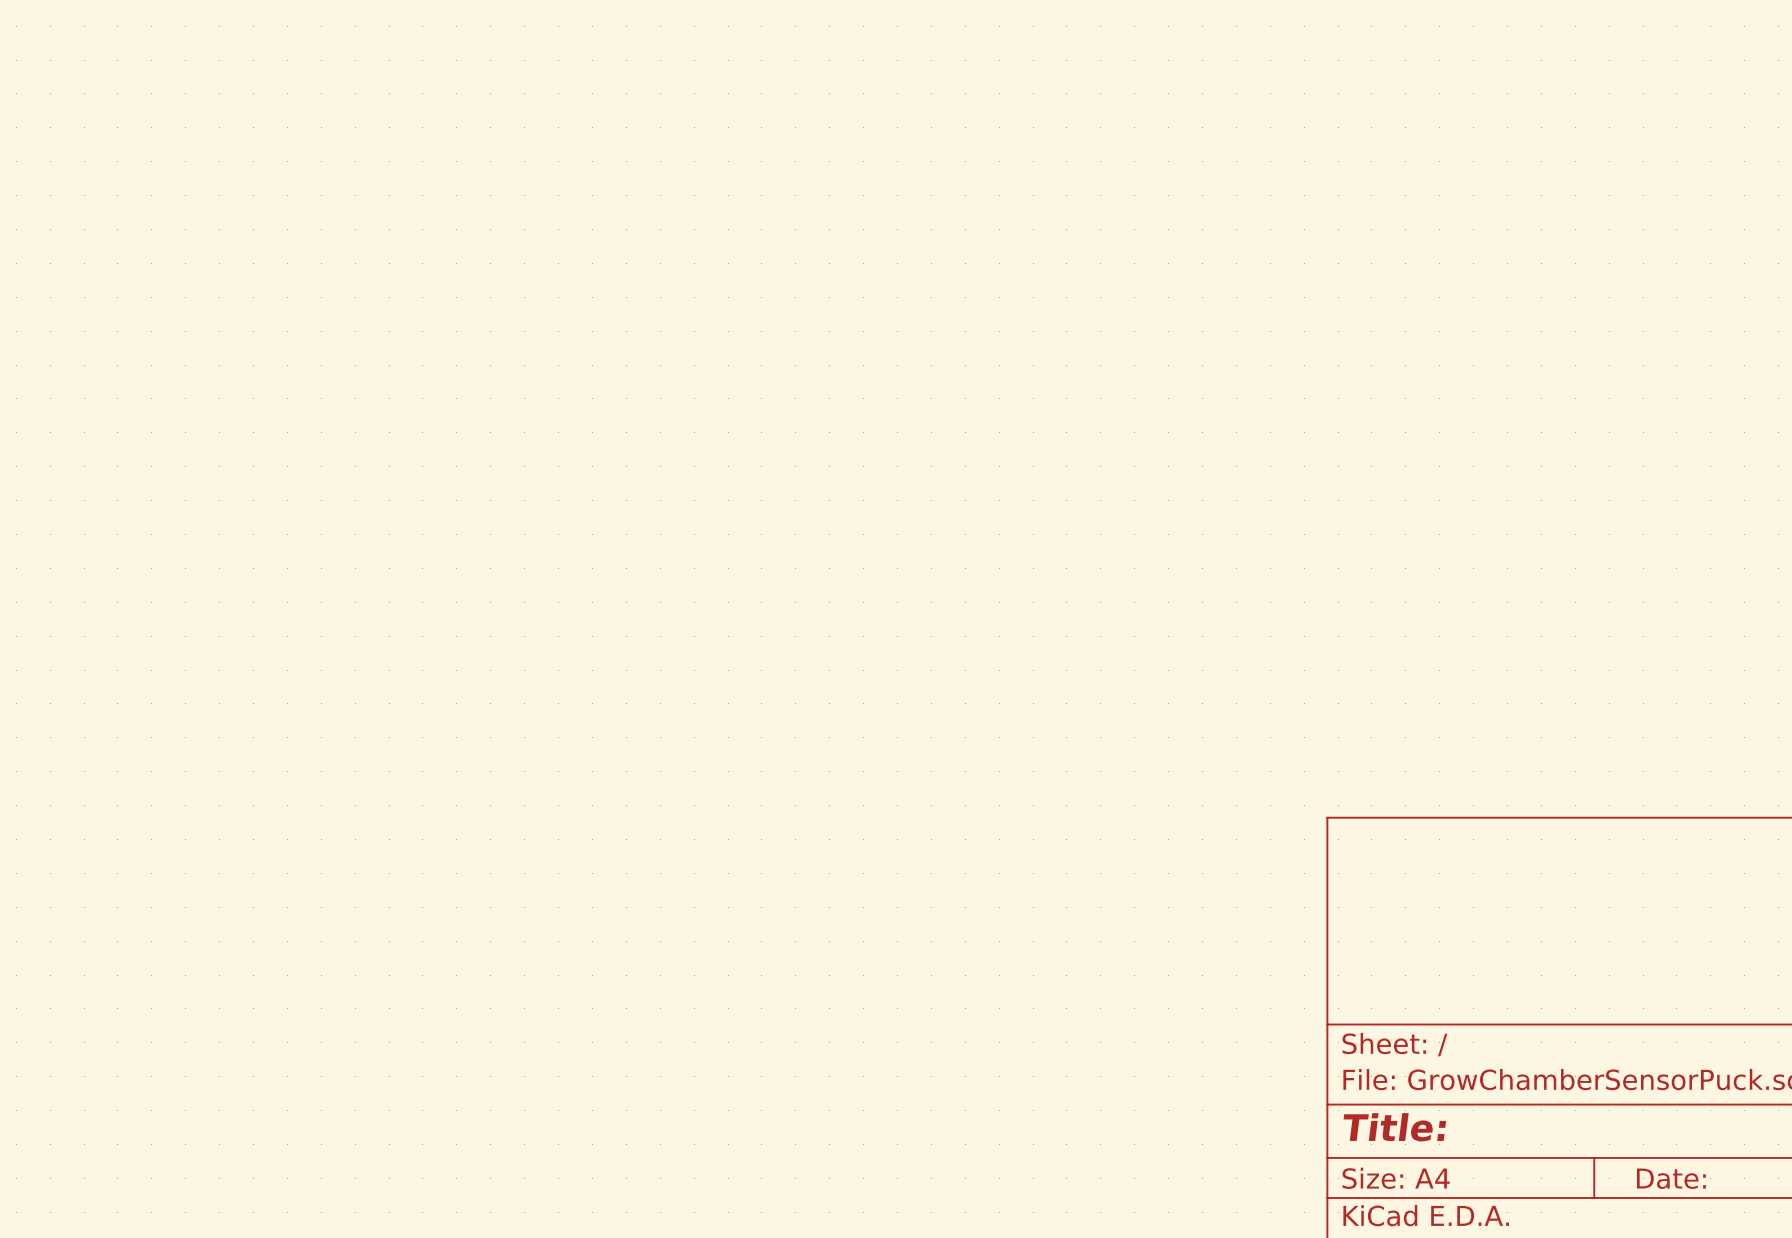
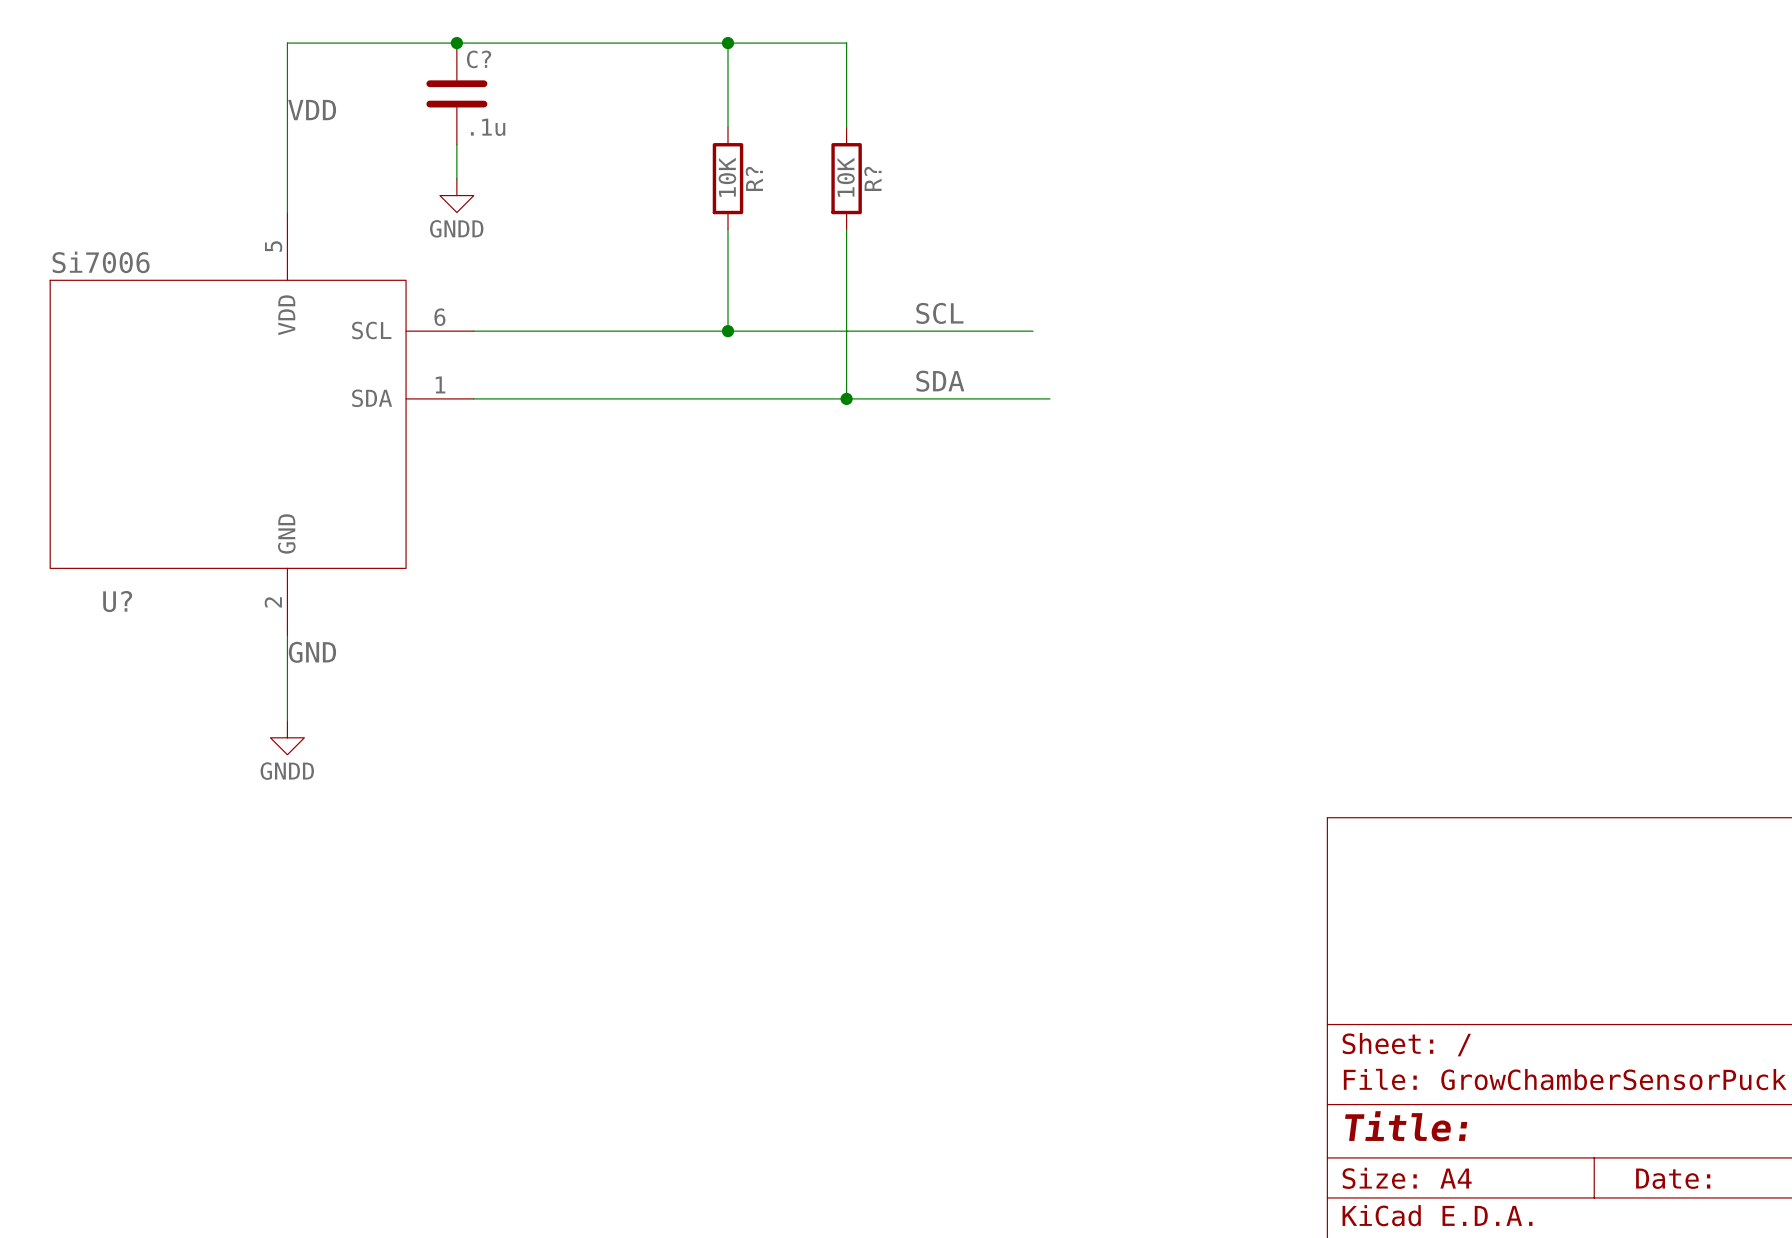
junction: none -> (456, 43)
wire: none -> (728, 43) (728, 127)
junction: none -> (728, 43)
C?: none -> .1u (456, 93)
label: none -> VDD (312, 110)
wire: none -> (846, 127) (846, 43) (287, 43) (287, 212)
wire: none -> (456, 144) (456, 178)
R?: none -> 10K (728, 178)
R?: none -> 10K (846, 178)
power symbol: none -> GNDD (456, 195)
wire: none -> (728, 229) (728, 331)
wire: none -> (846, 229) (846, 398)
label: none -> SCL (939, 313)
wire: none -> (473, 331) (1033, 331)
junction: none -> (728, 331)
label: none -> SDA (940, 381)
wire: none -> (473, 398) (1049, 398)
junction: none -> (846, 398)
U?: none -> Si7006 (262, 424)
wire: none -> (287, 636) (287, 720)
label: none -> GND (312, 652)
power symbol: none -> GNDD (287, 737)

